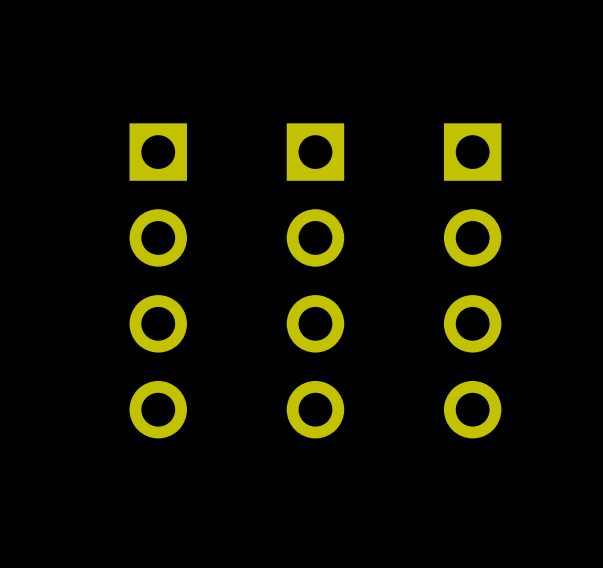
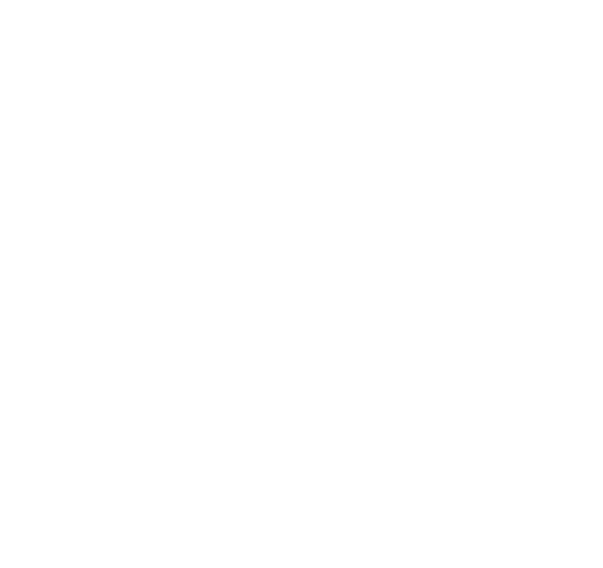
part: (158, 280) -> none
part: (315, 280) -> none
part: (472, 280) -> none

